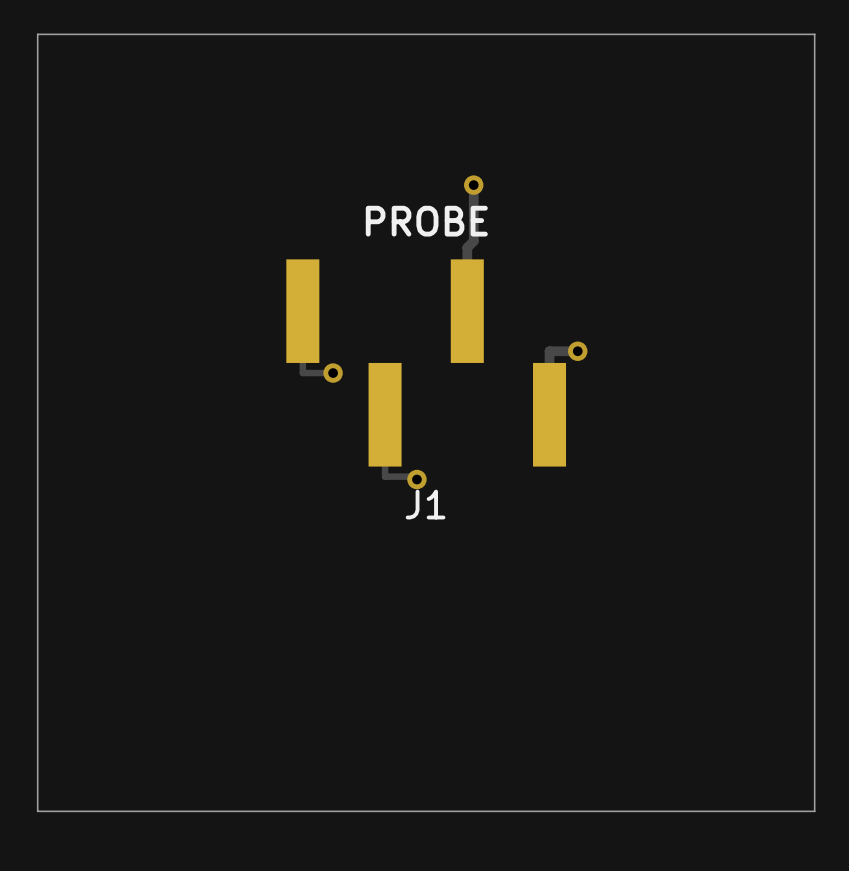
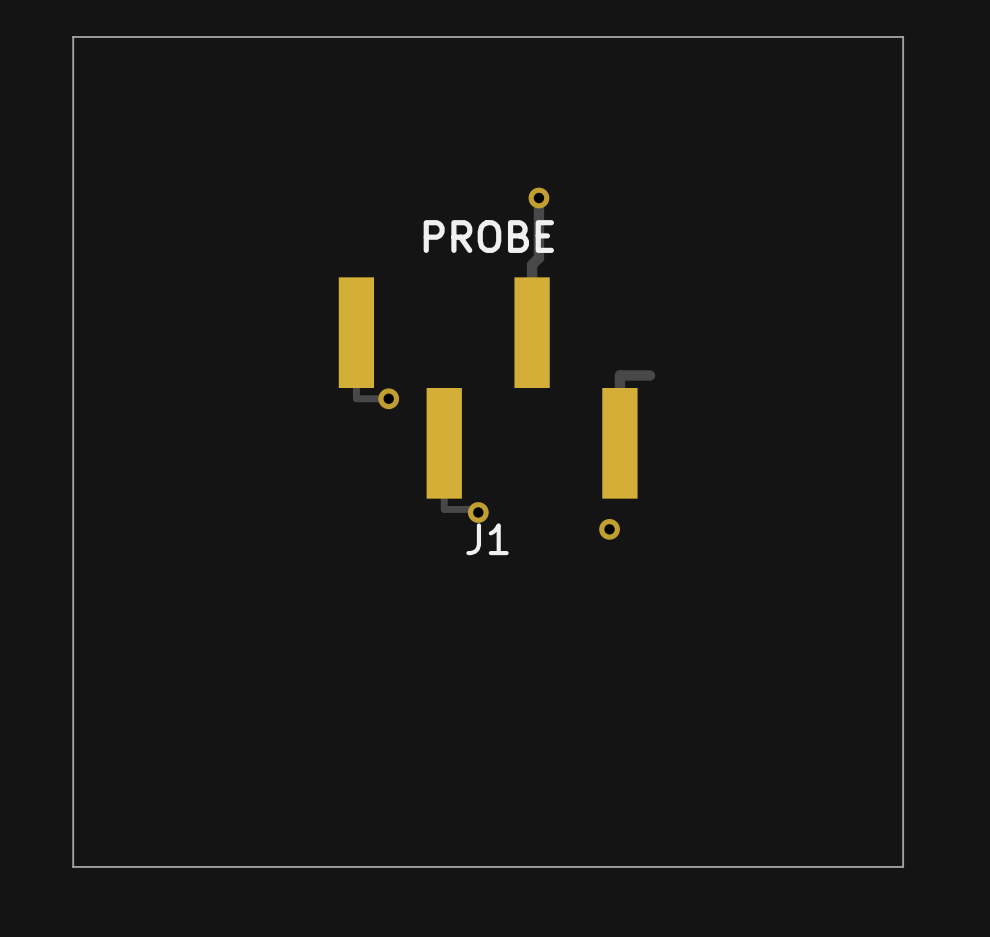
via position: (577, 351) -> (609, 529)

